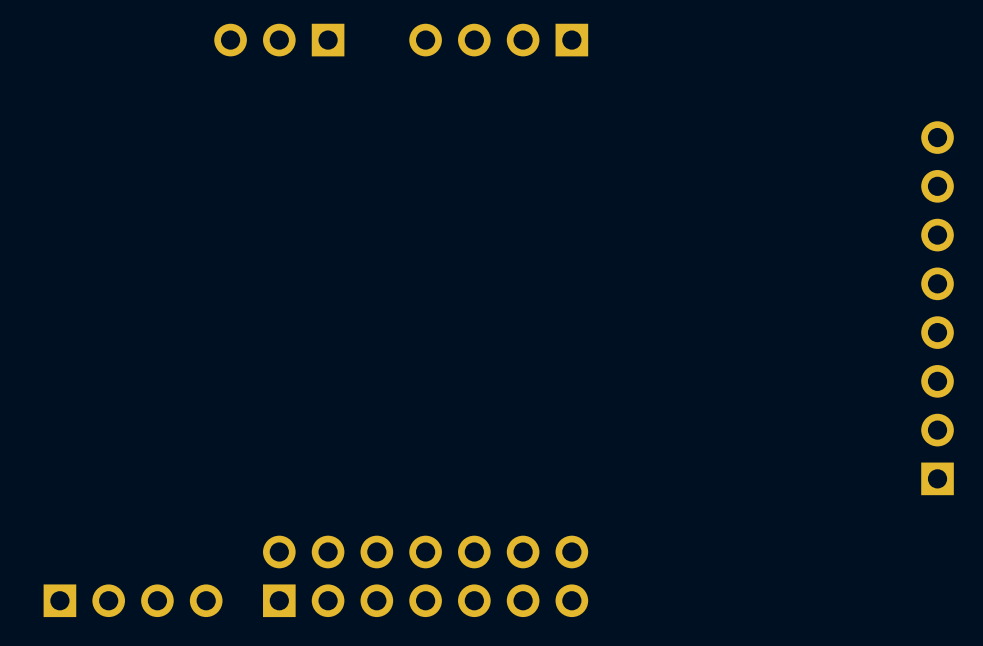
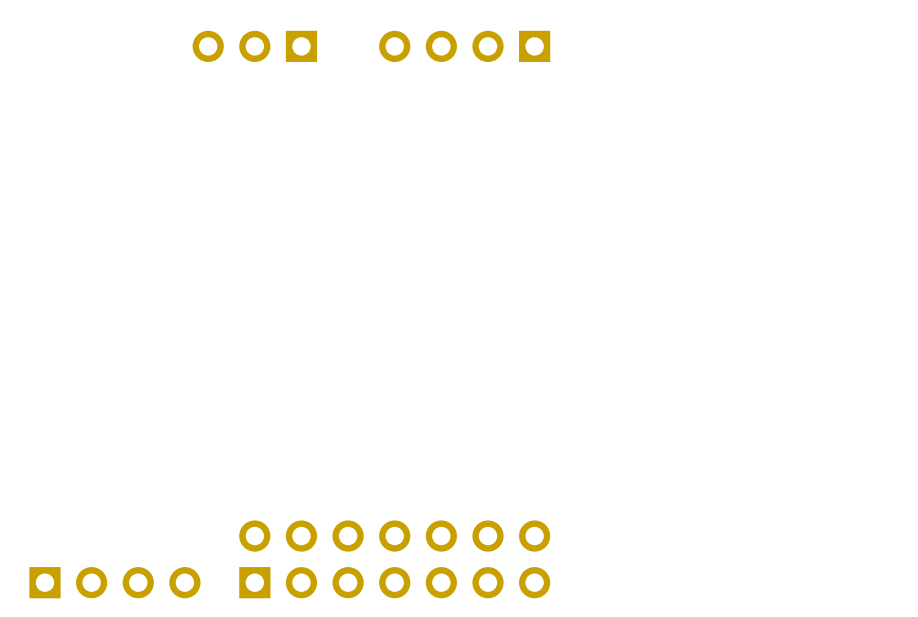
part: (937, 308) -> none

